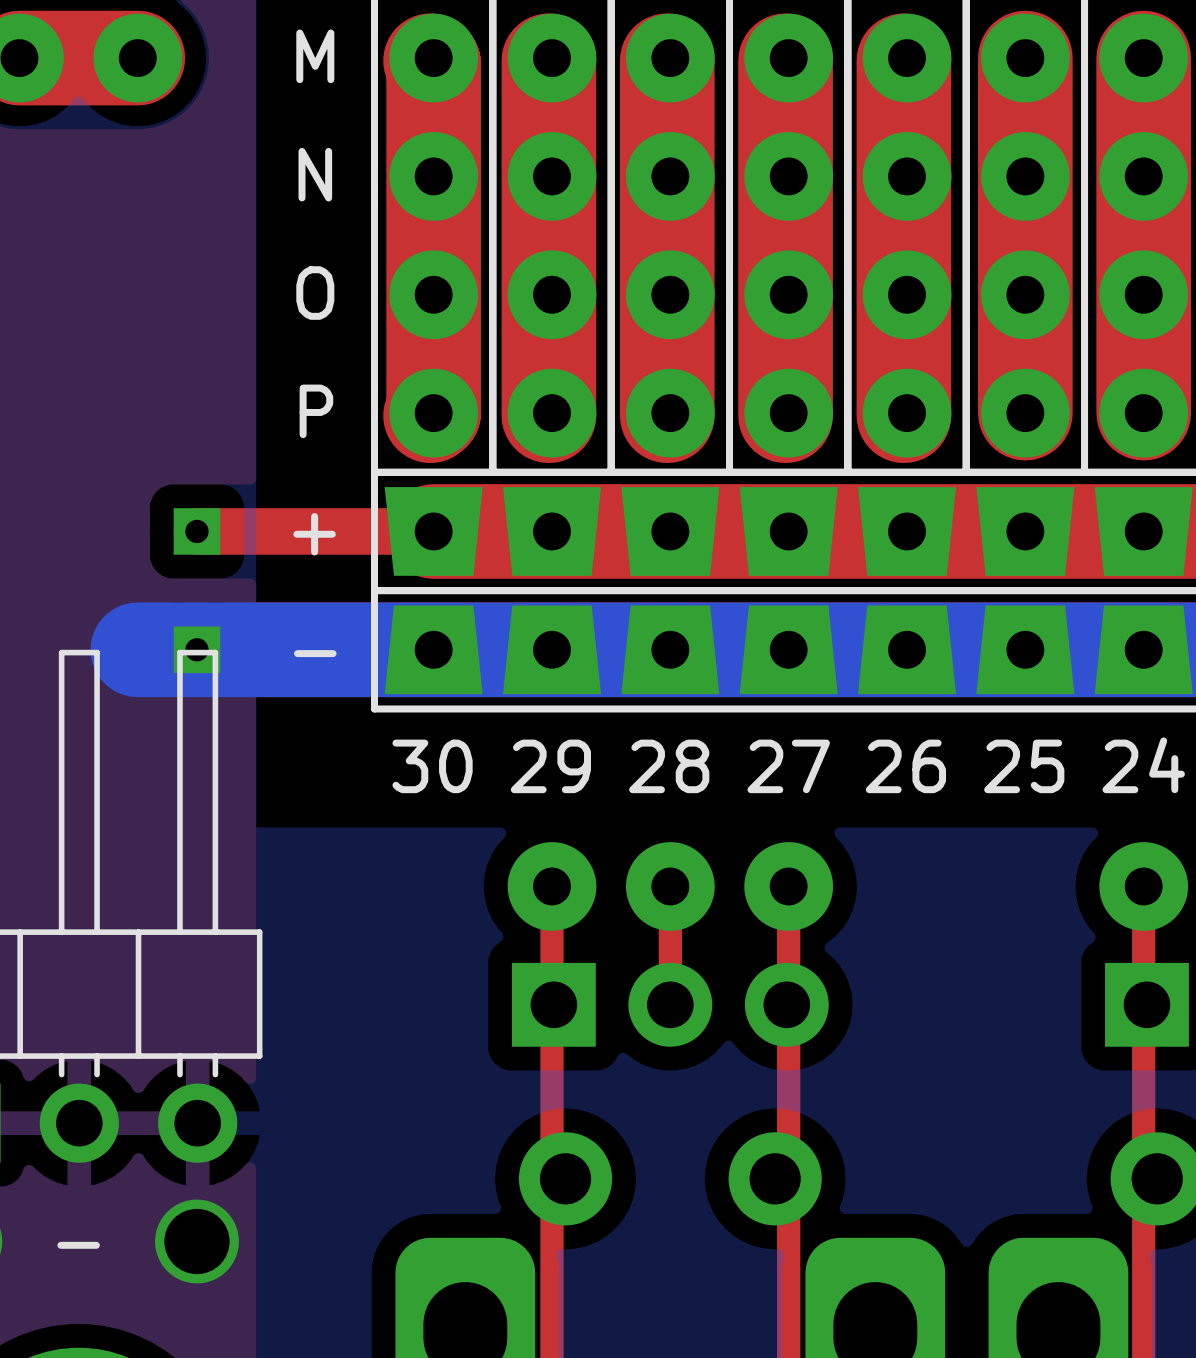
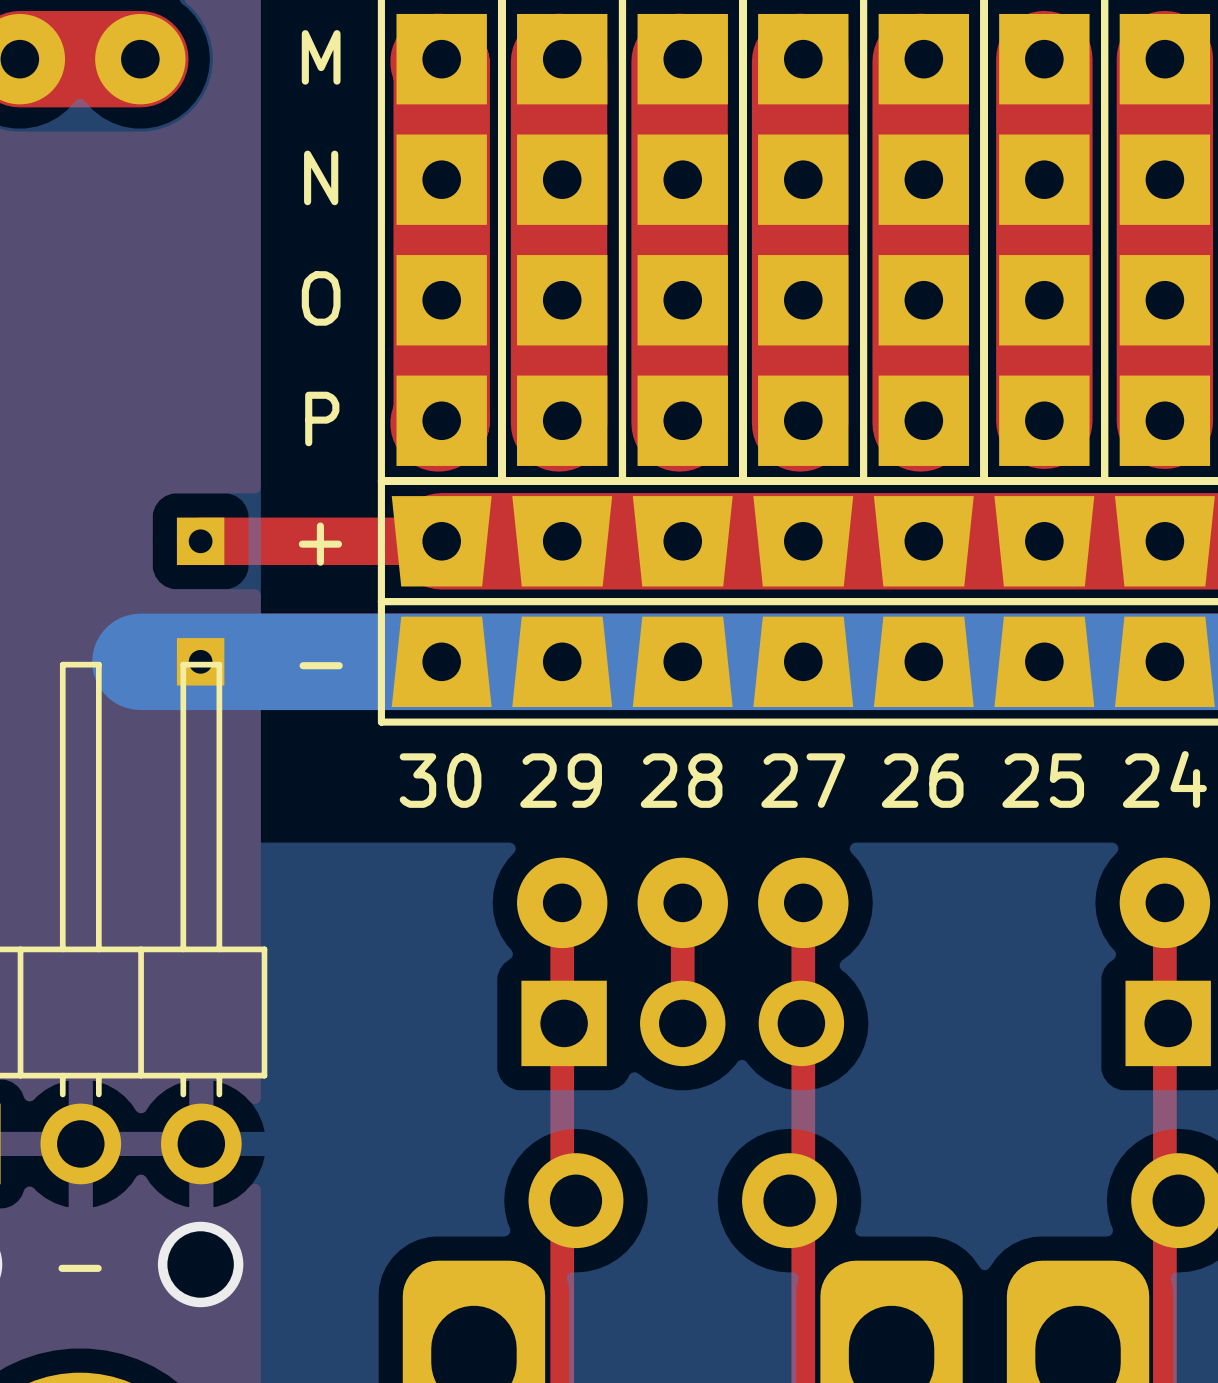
part: (433, 58) -> none
part: (552, 58) -> none
part: (670, 58) -> none
part: (788, 58) -> none
part: (907, 58) -> none
part: (1025, 58) -> none
part: (1143, 58) -> none
part: (433, 176) -> none
part: (552, 176) -> none
part: (670, 176) -> none
part: (788, 176) -> none
part: (907, 176) -> none
part: (1025, 176) -> none
part: (1143, 176) -> none
part: none -> (441, 239)
part: none -> (562, 239)
part: none -> (682, 239)
part: none -> (803, 239)
part: none -> (923, 239)
part: none -> (1044, 239)
part: none -> (1164, 239)
part: (433, 294) -> none
part: (552, 294) -> none
part: (670, 294) -> none
part: (788, 294) -> none
part: (907, 294) -> none
part: (1025, 294) -> none
part: (1143, 294) -> none
part: (433, 413) -> none
part: (552, 413) -> none
part: (670, 413) -> none
part: (788, 413) -> none
part: (907, 413) -> none
part: (1025, 413) -> none
part: (1143, 413) -> none

